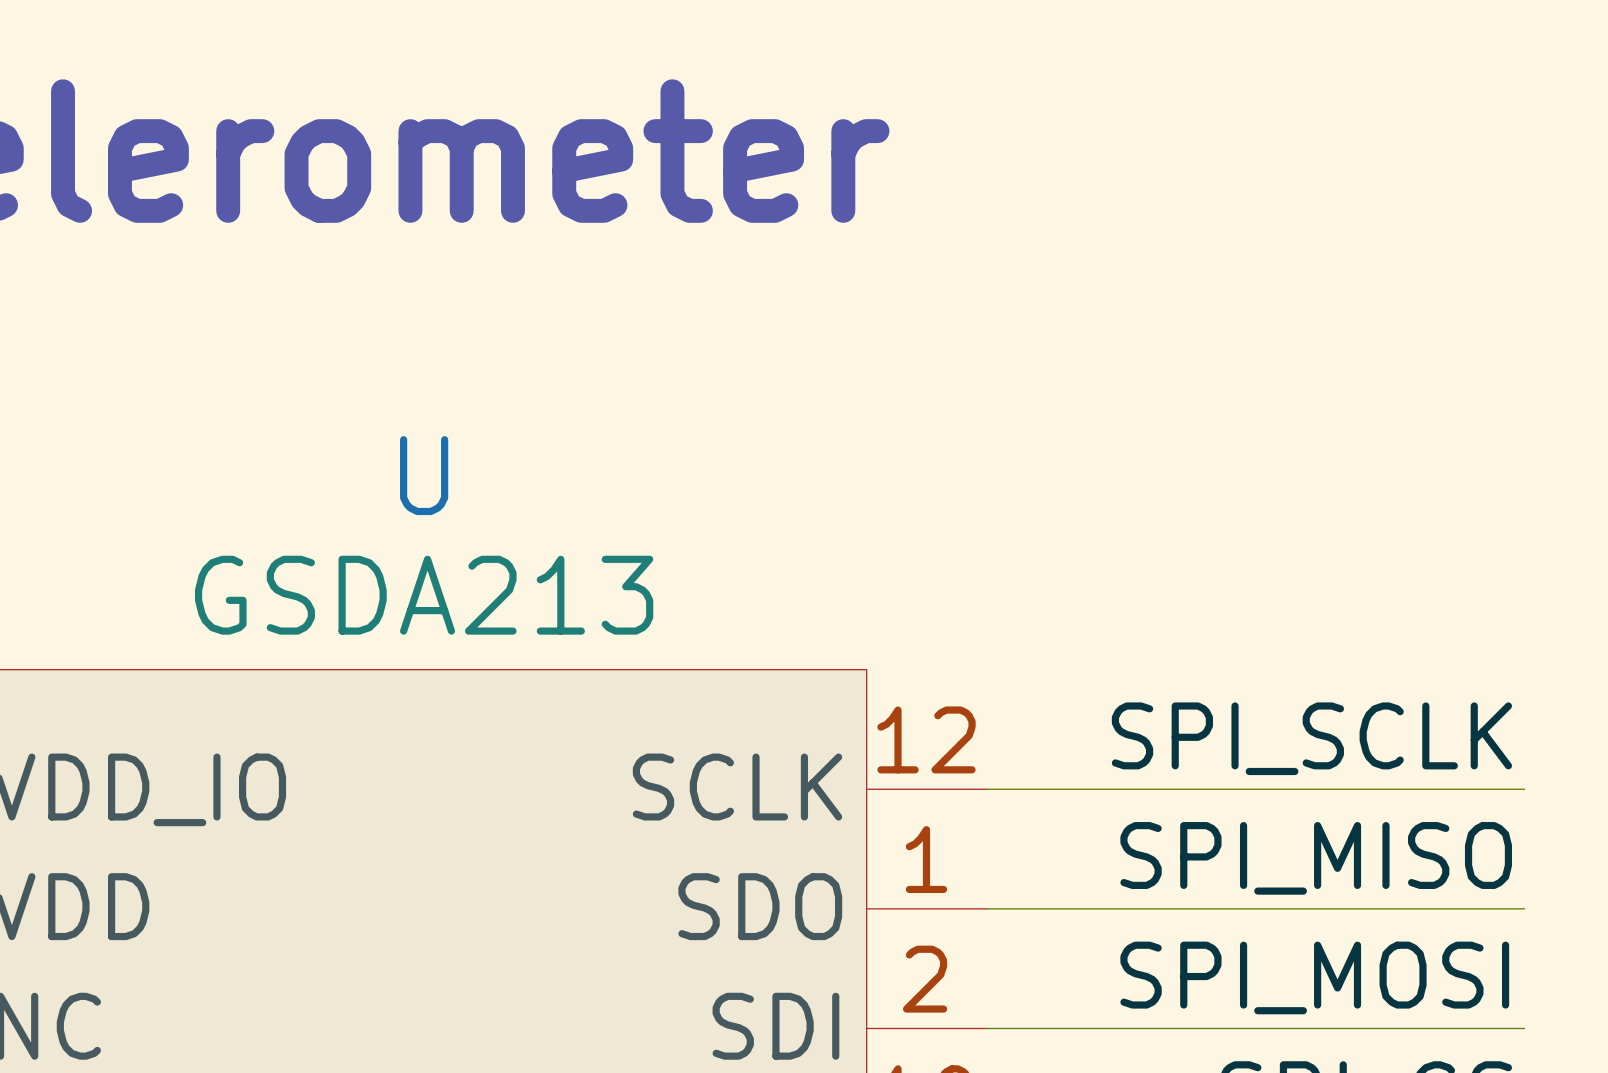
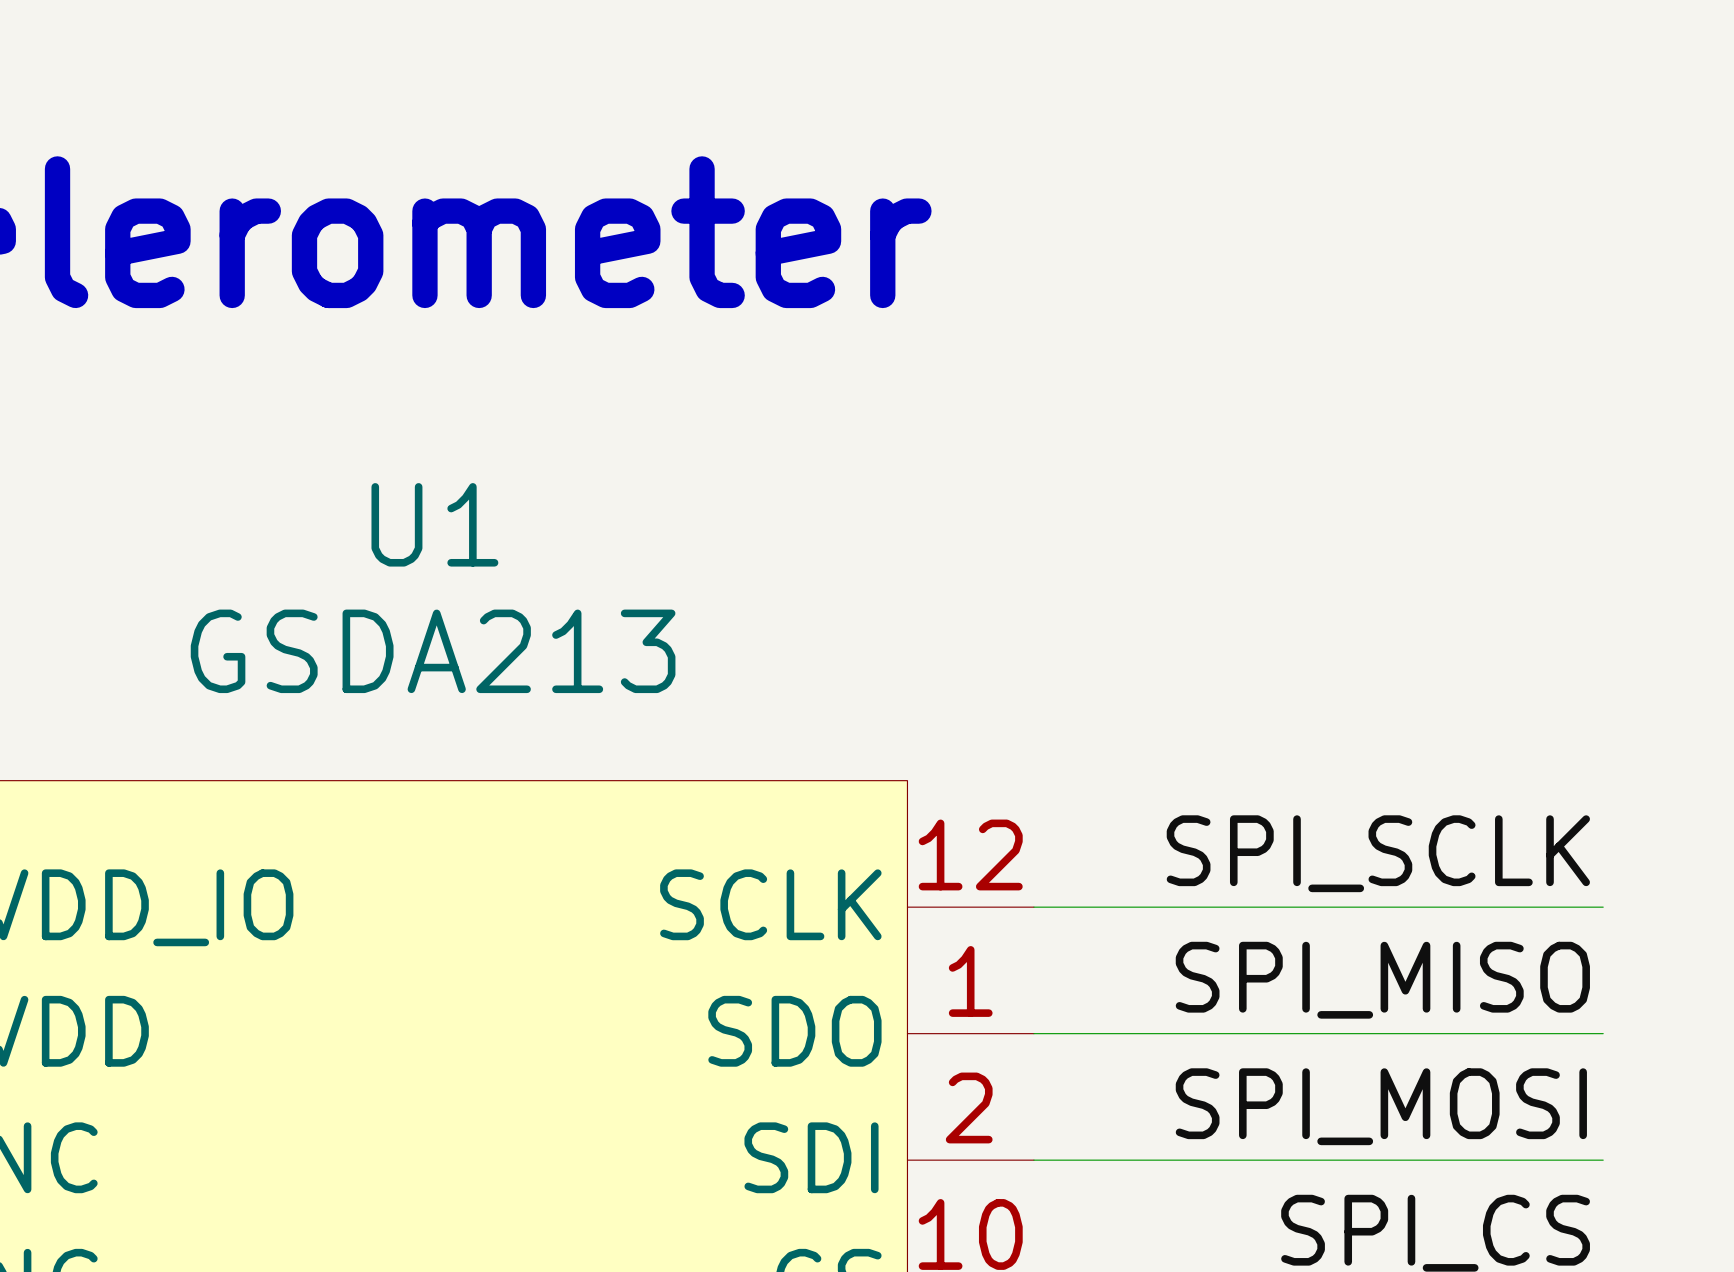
U name: U (424, 475) -> U1 (434, 524)
U value position: GSDA213 (424, 595) -> GSDA213 (433, 651)

